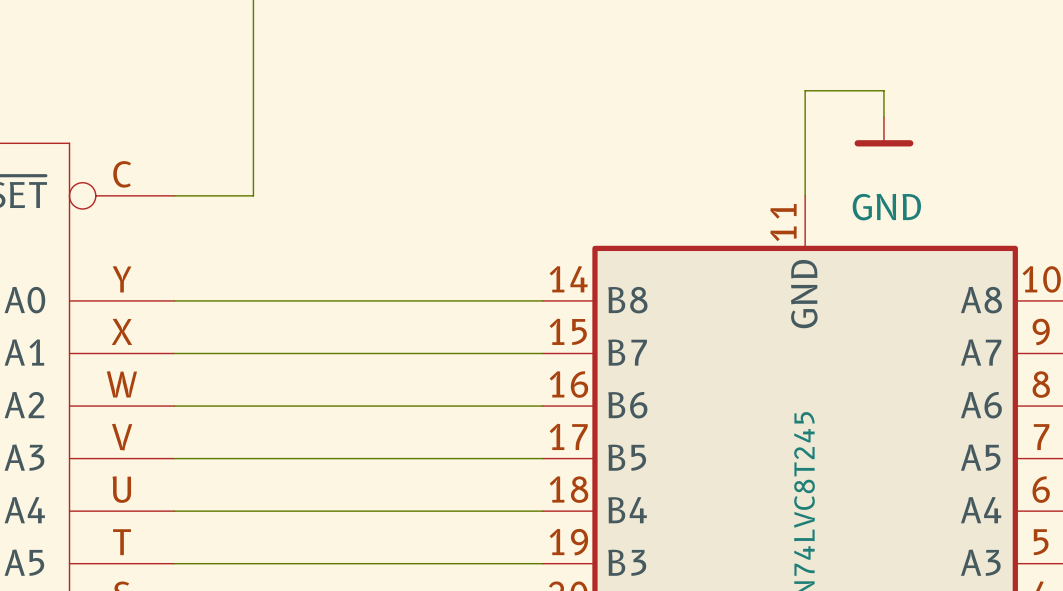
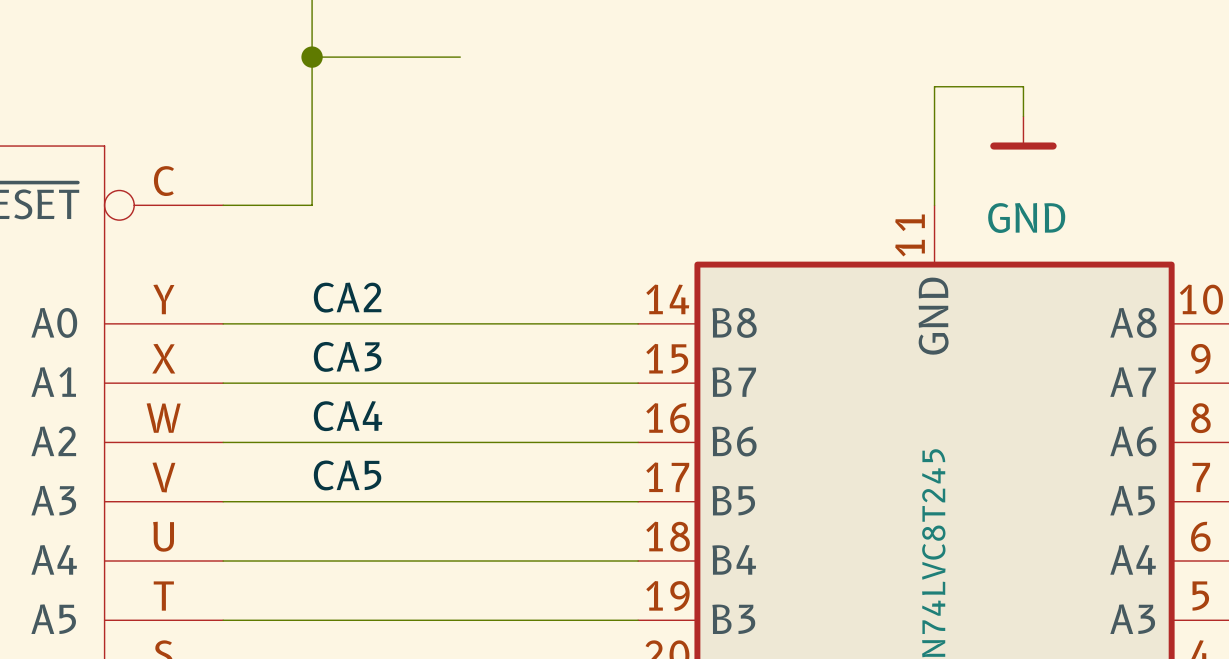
wire: none -> (312, 57) (460, 57)
junction: none -> (312, 57)
label: none -> CA2 (347, 297)
label: none -> CA3 (347, 356)
label: none -> CA4 (348, 416)
label: none -> CA5 (347, 475)

